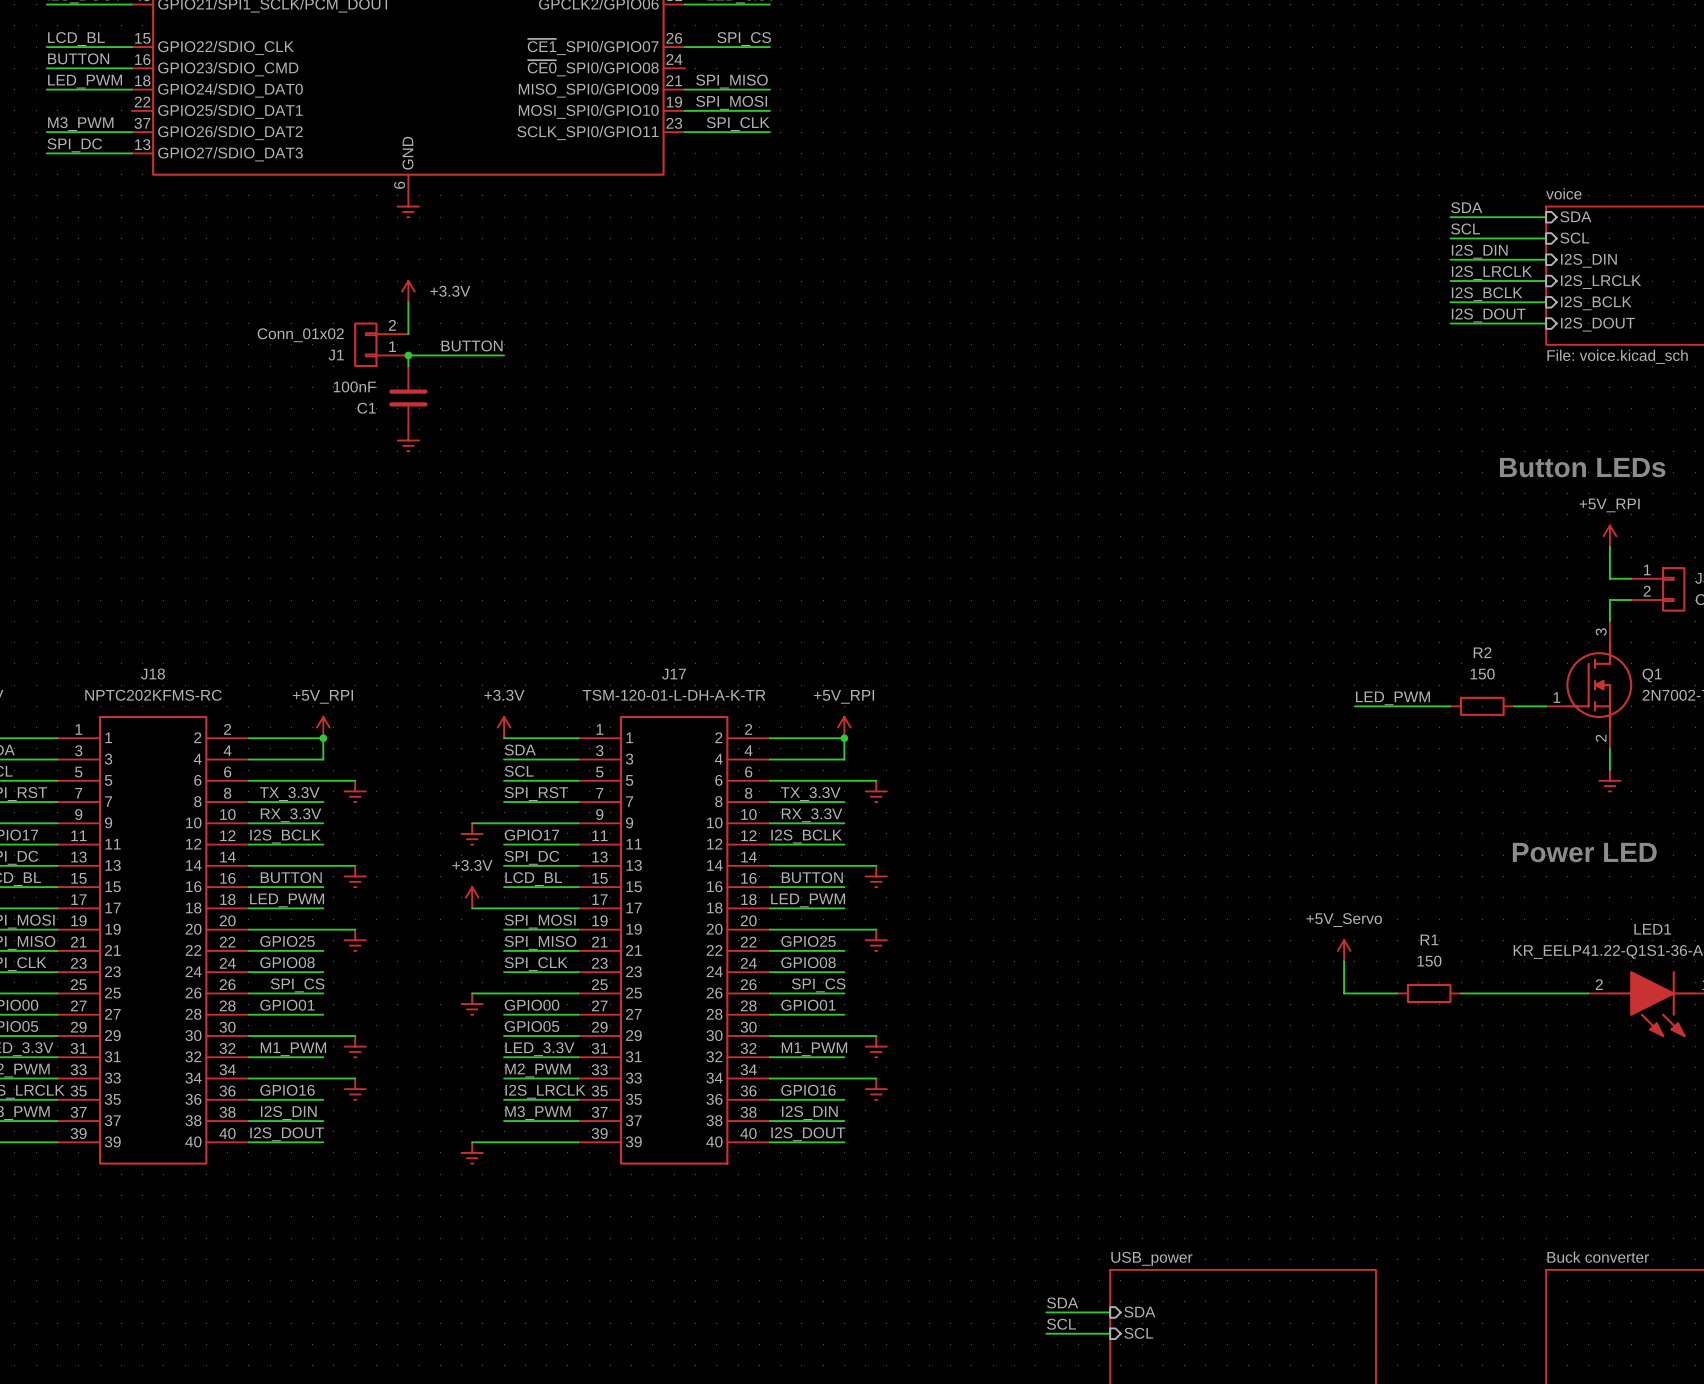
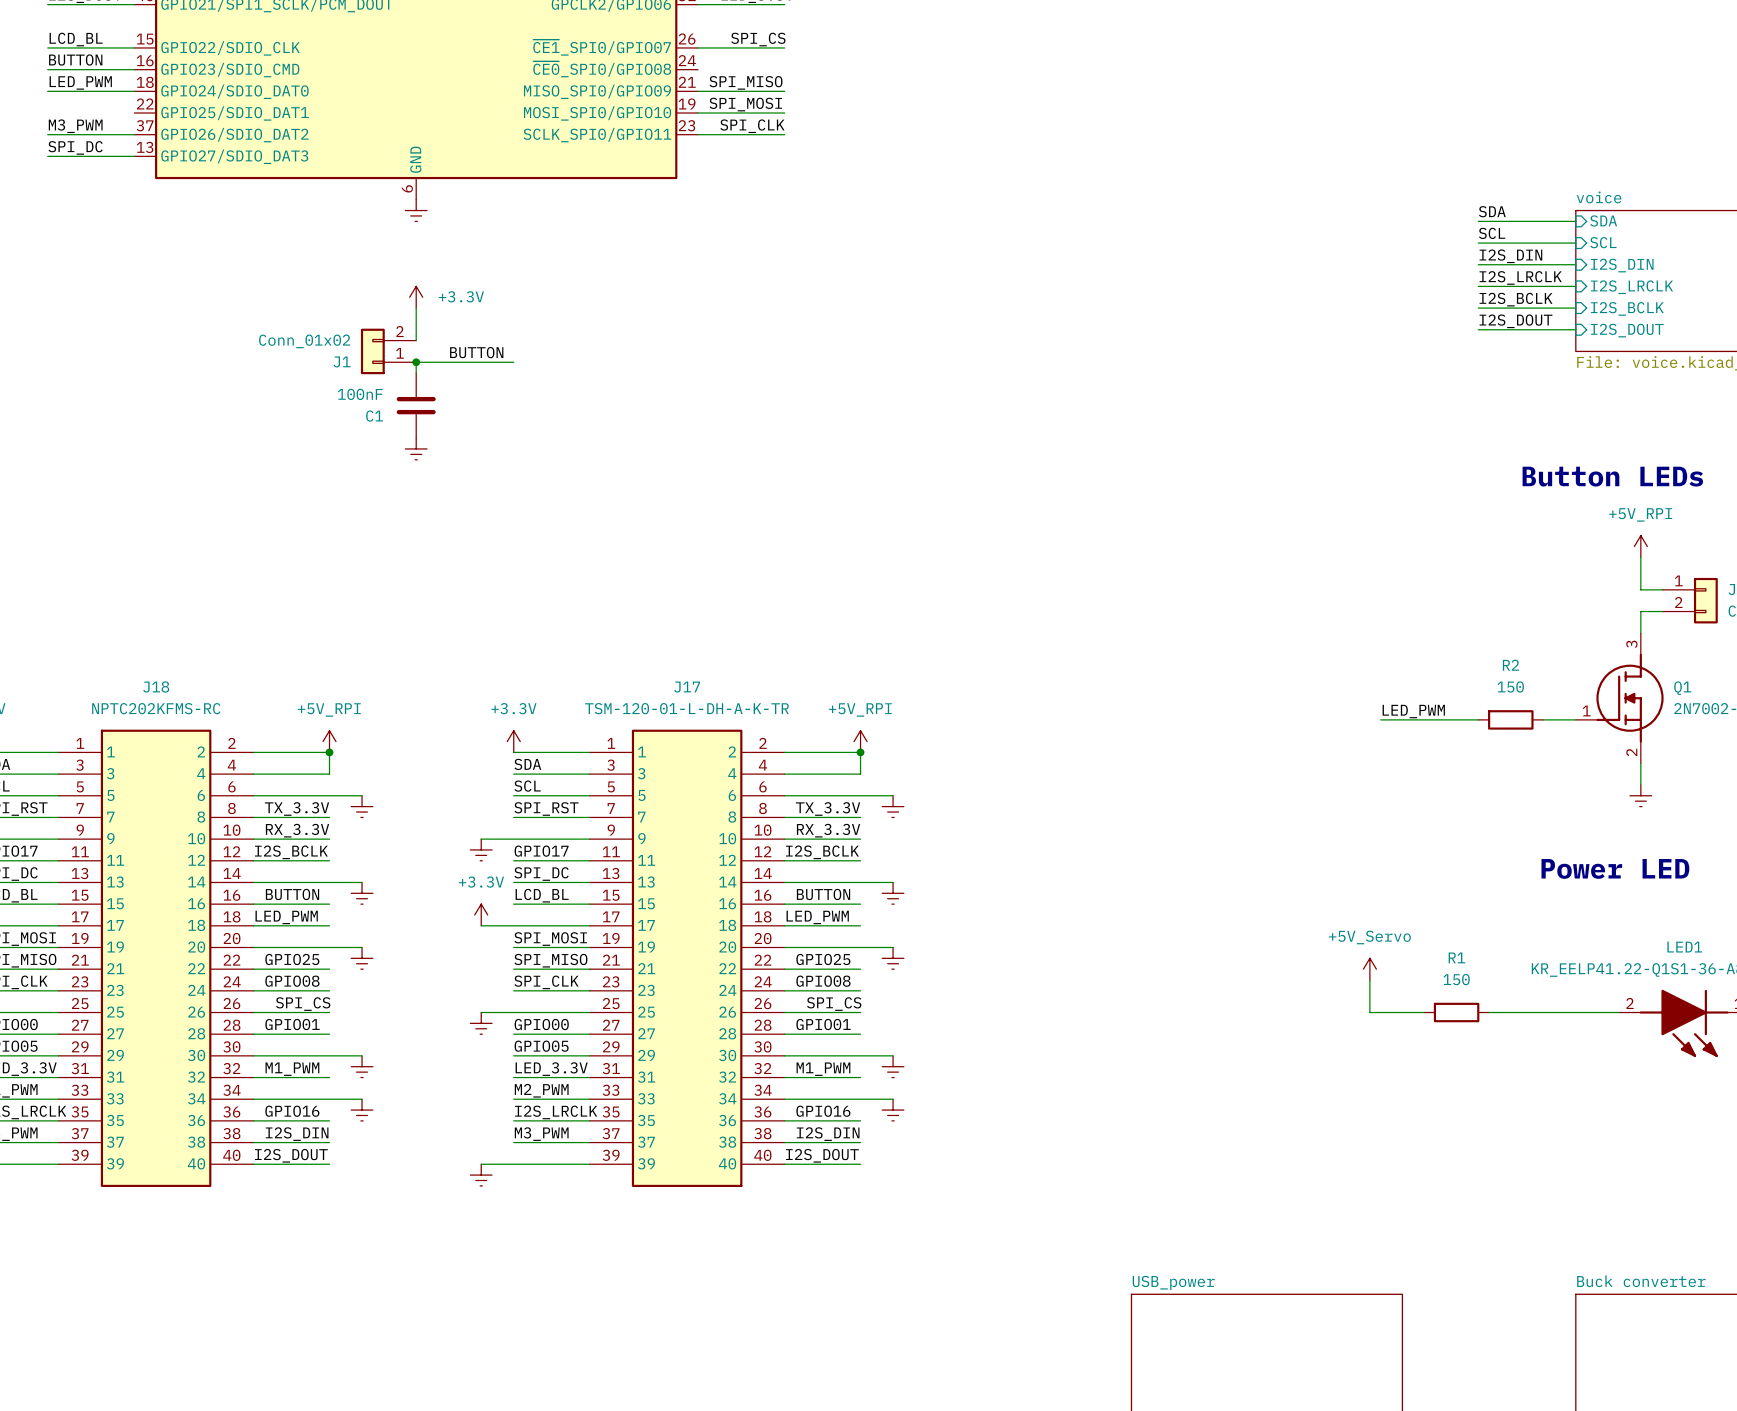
label: SDA (1062, 1302) -> none
wire: (1046, 1312) (1110, 1312) -> none
sheet pin: SDA (1139, 1312) -> none
label: SCL (1061, 1324) -> none
wire: (1046, 1333) (1110, 1333) -> none
sheet pin: SCL (1138, 1333) -> none

